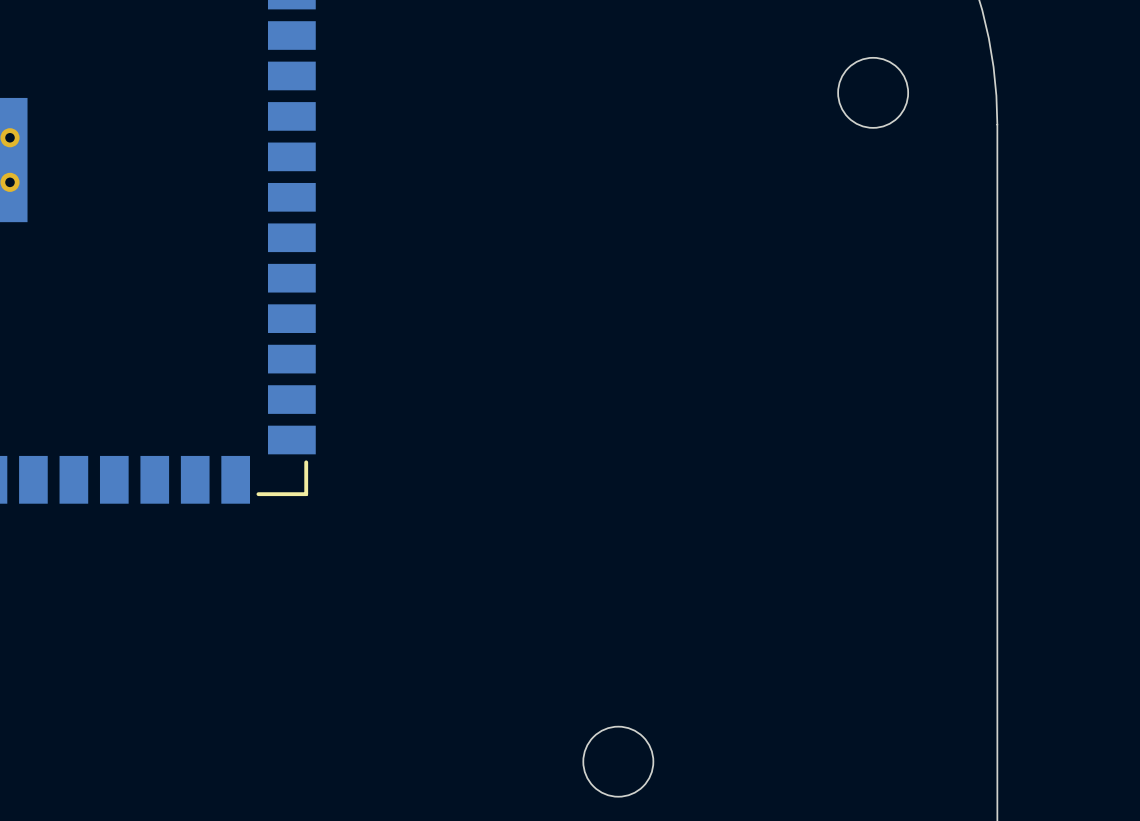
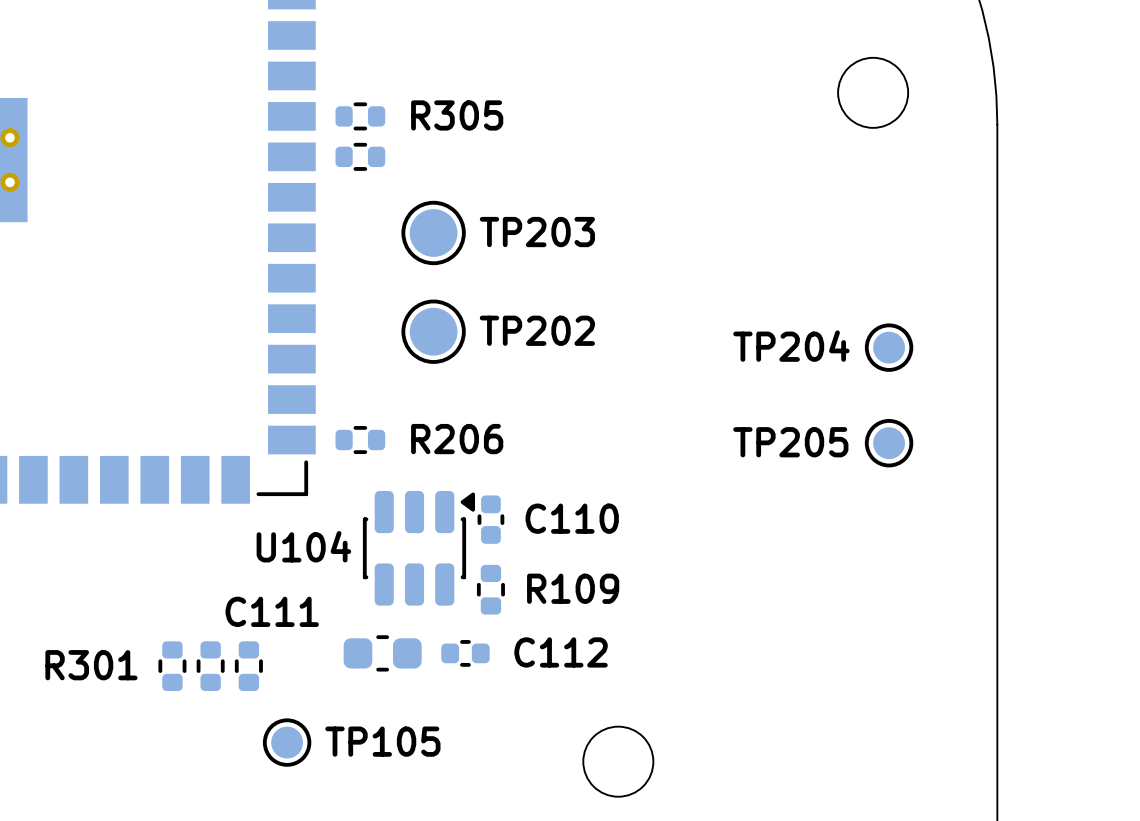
R305: none -> (360, 116)
part: none -> (360, 156)
TP203: none -> (433, 232)
TP202: none -> (433, 331)
TP204: none -> (889, 347)
R206: none -> (360, 440)
TP205: none -> (889, 443)
C110: none -> (490, 519)
U104: none -> (418, 548)
R109: none -> (490, 589)
C111: none -> (382, 653)
C112: none -> (465, 653)
R301: none -> (172, 666)
part: none -> (210, 666)
part: none -> (248, 666)
TP105: none -> (287, 742)

